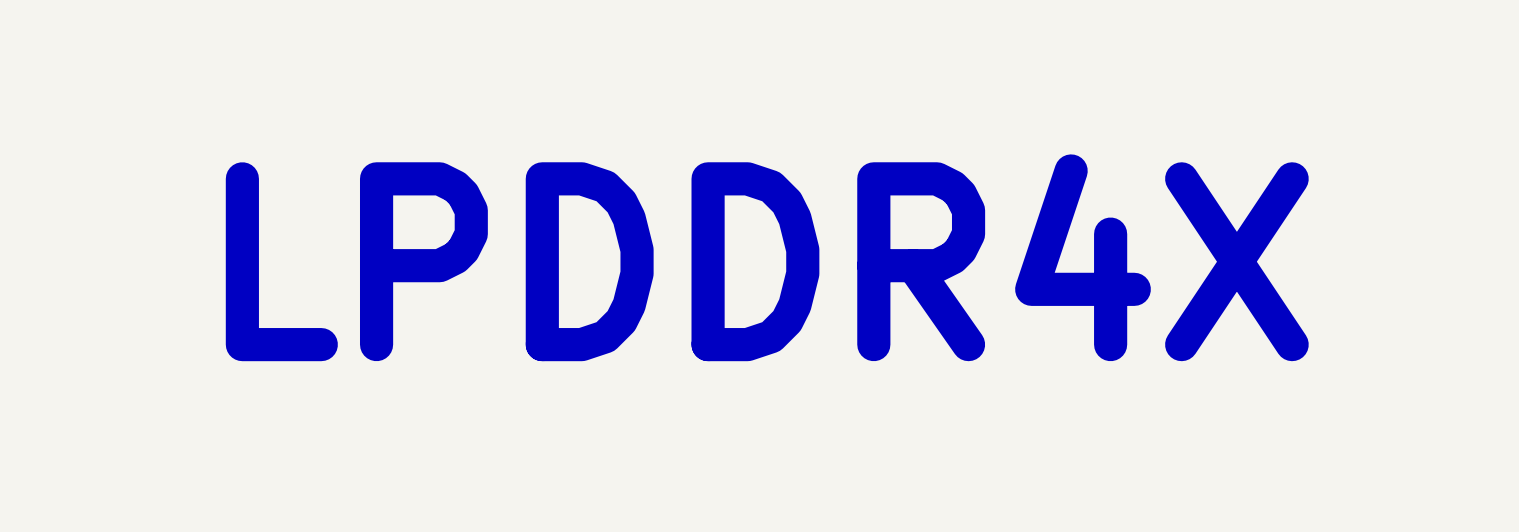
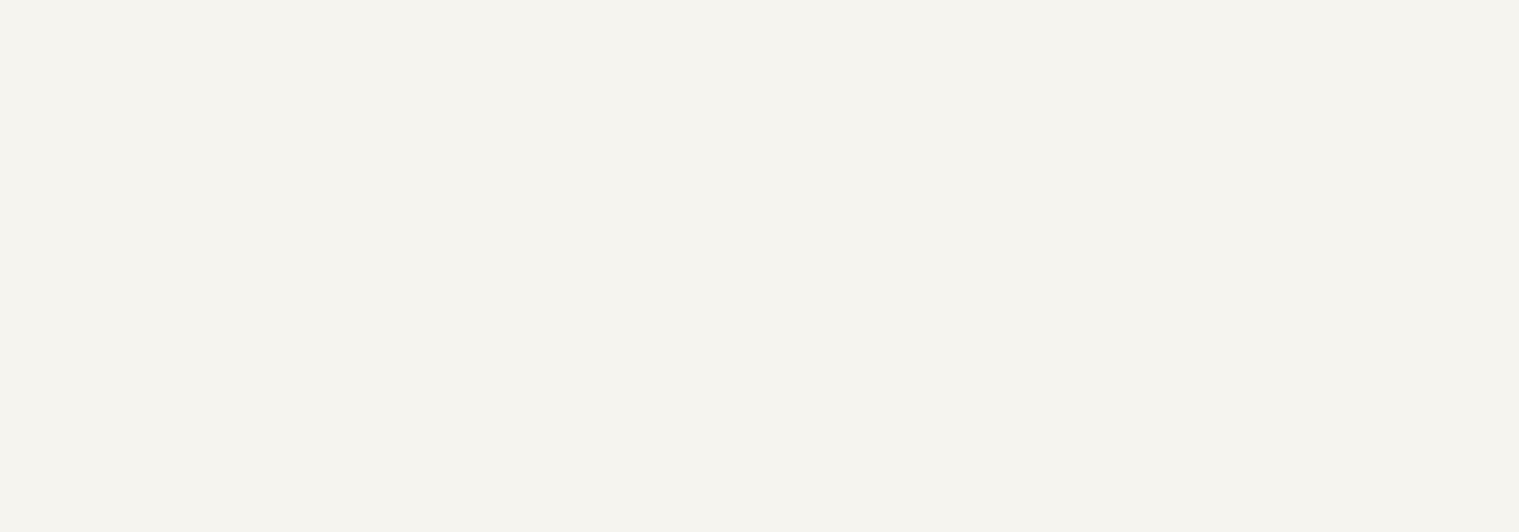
text: LPDDR4X (767, 257) -> none

